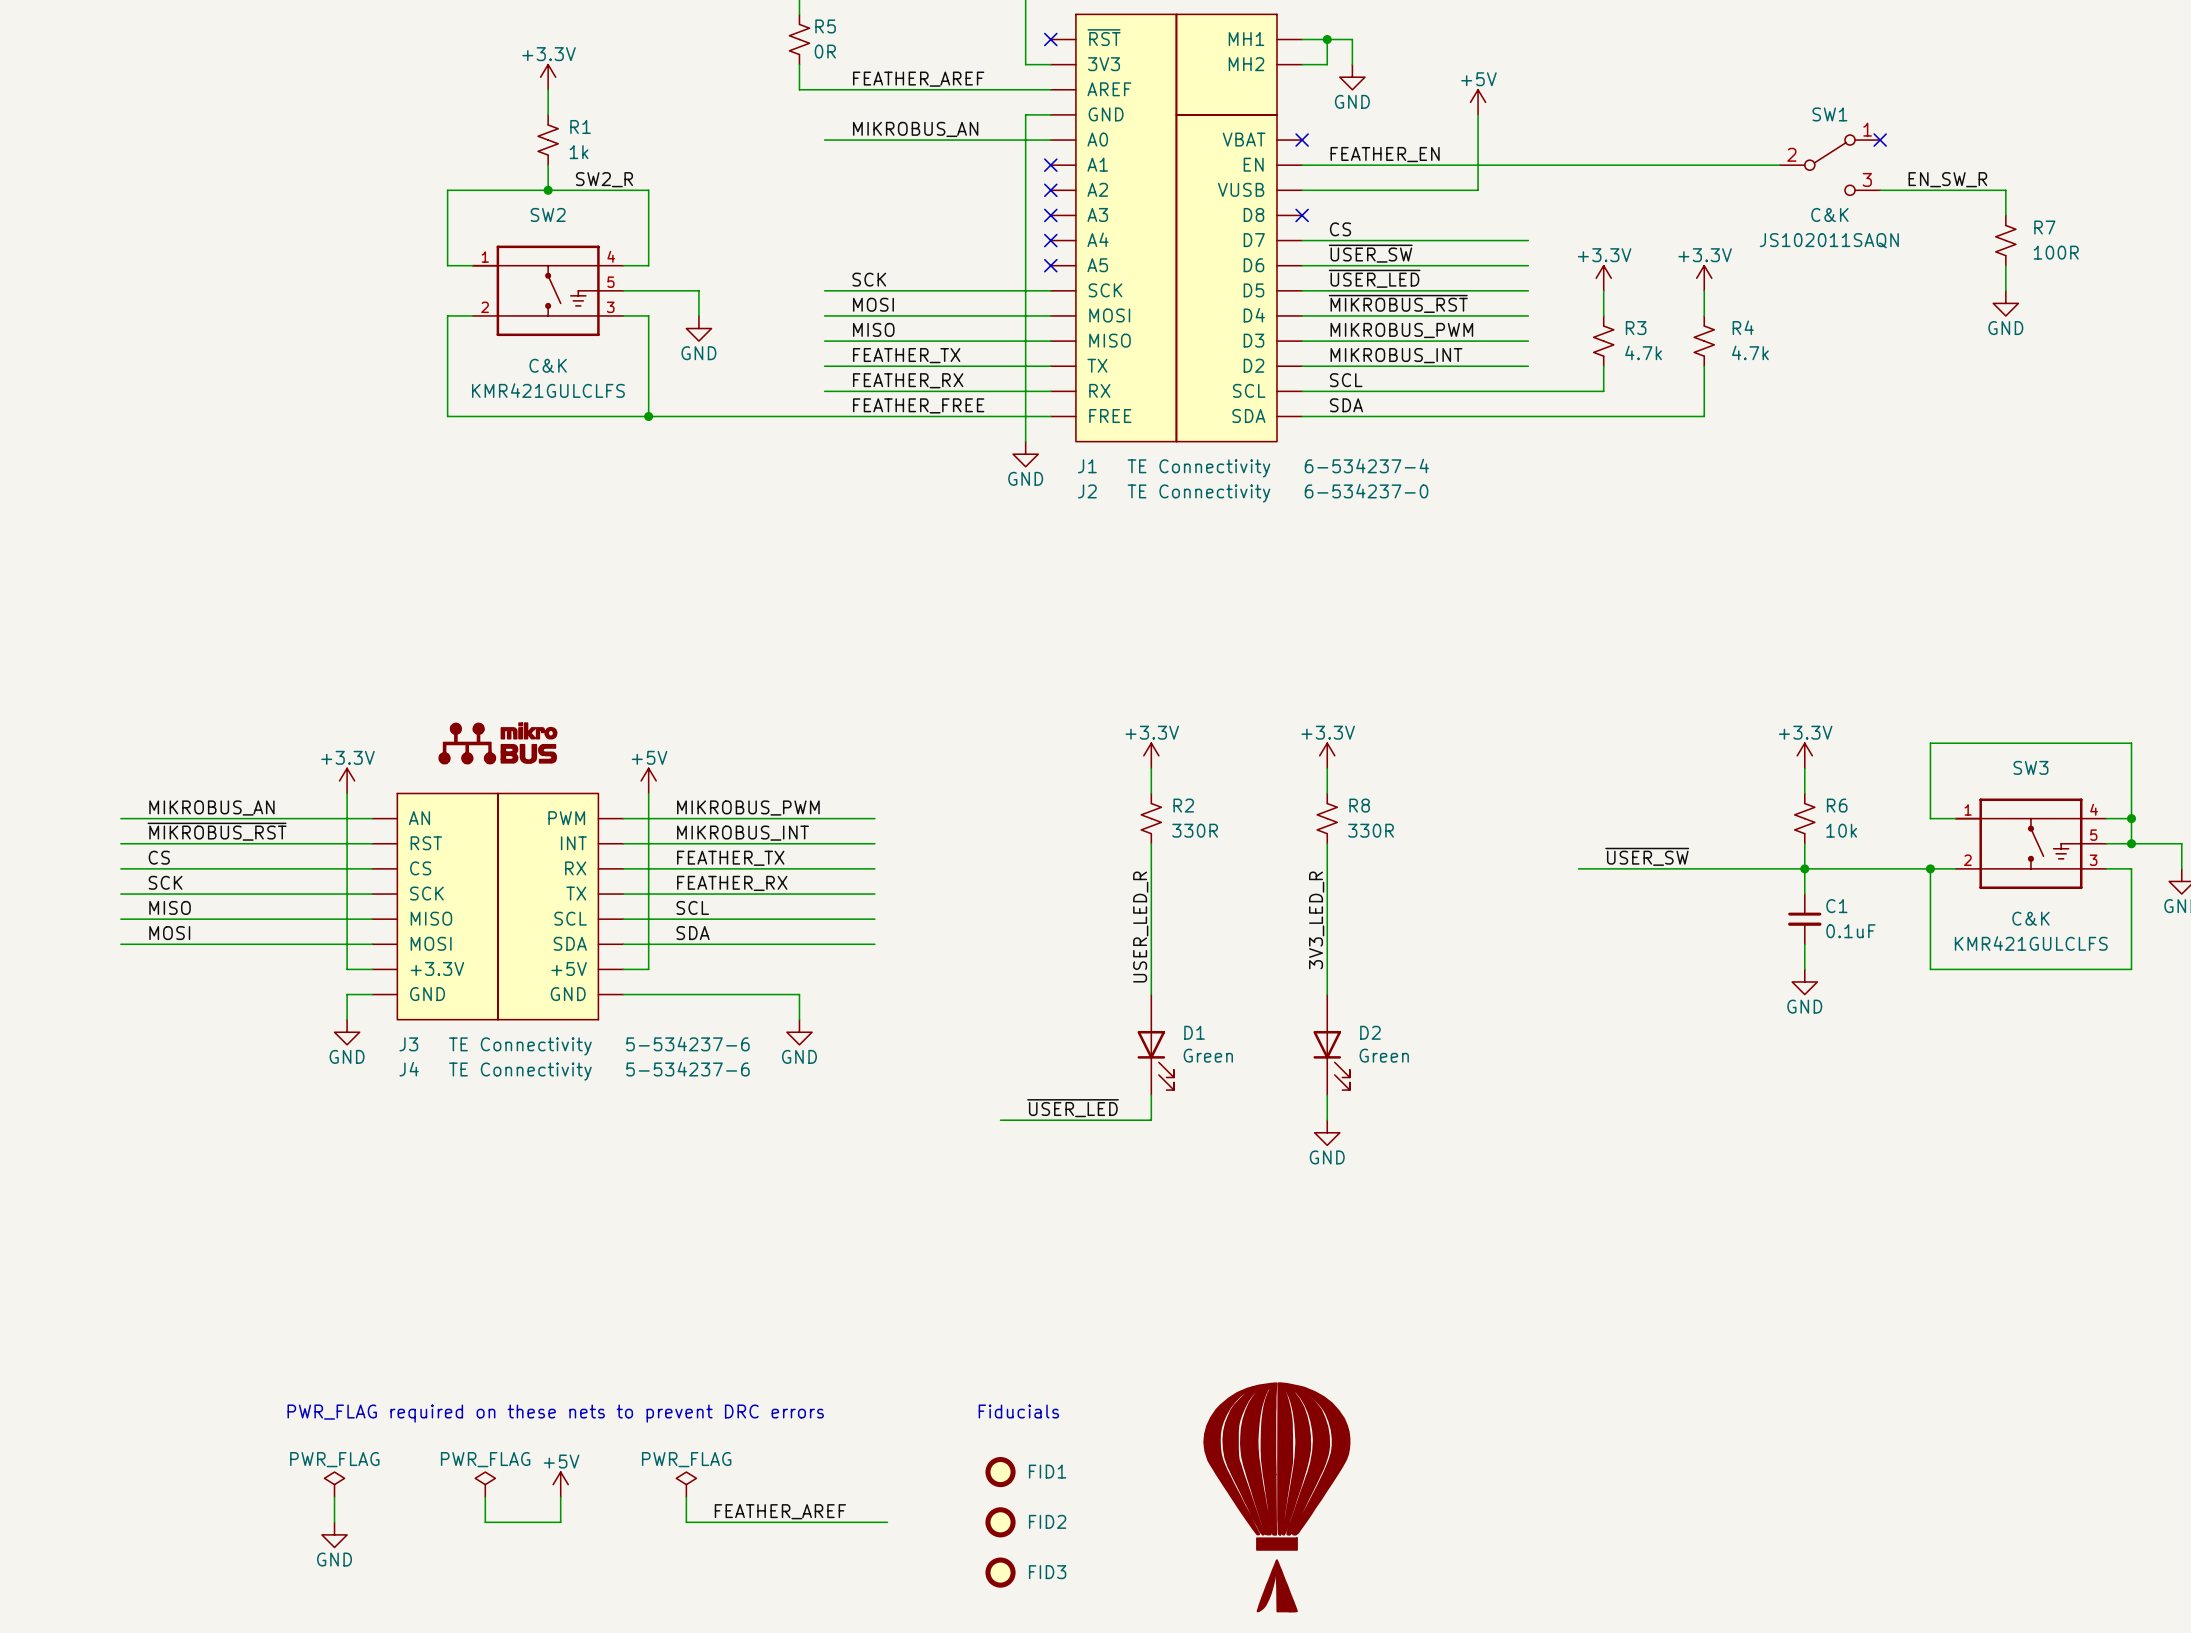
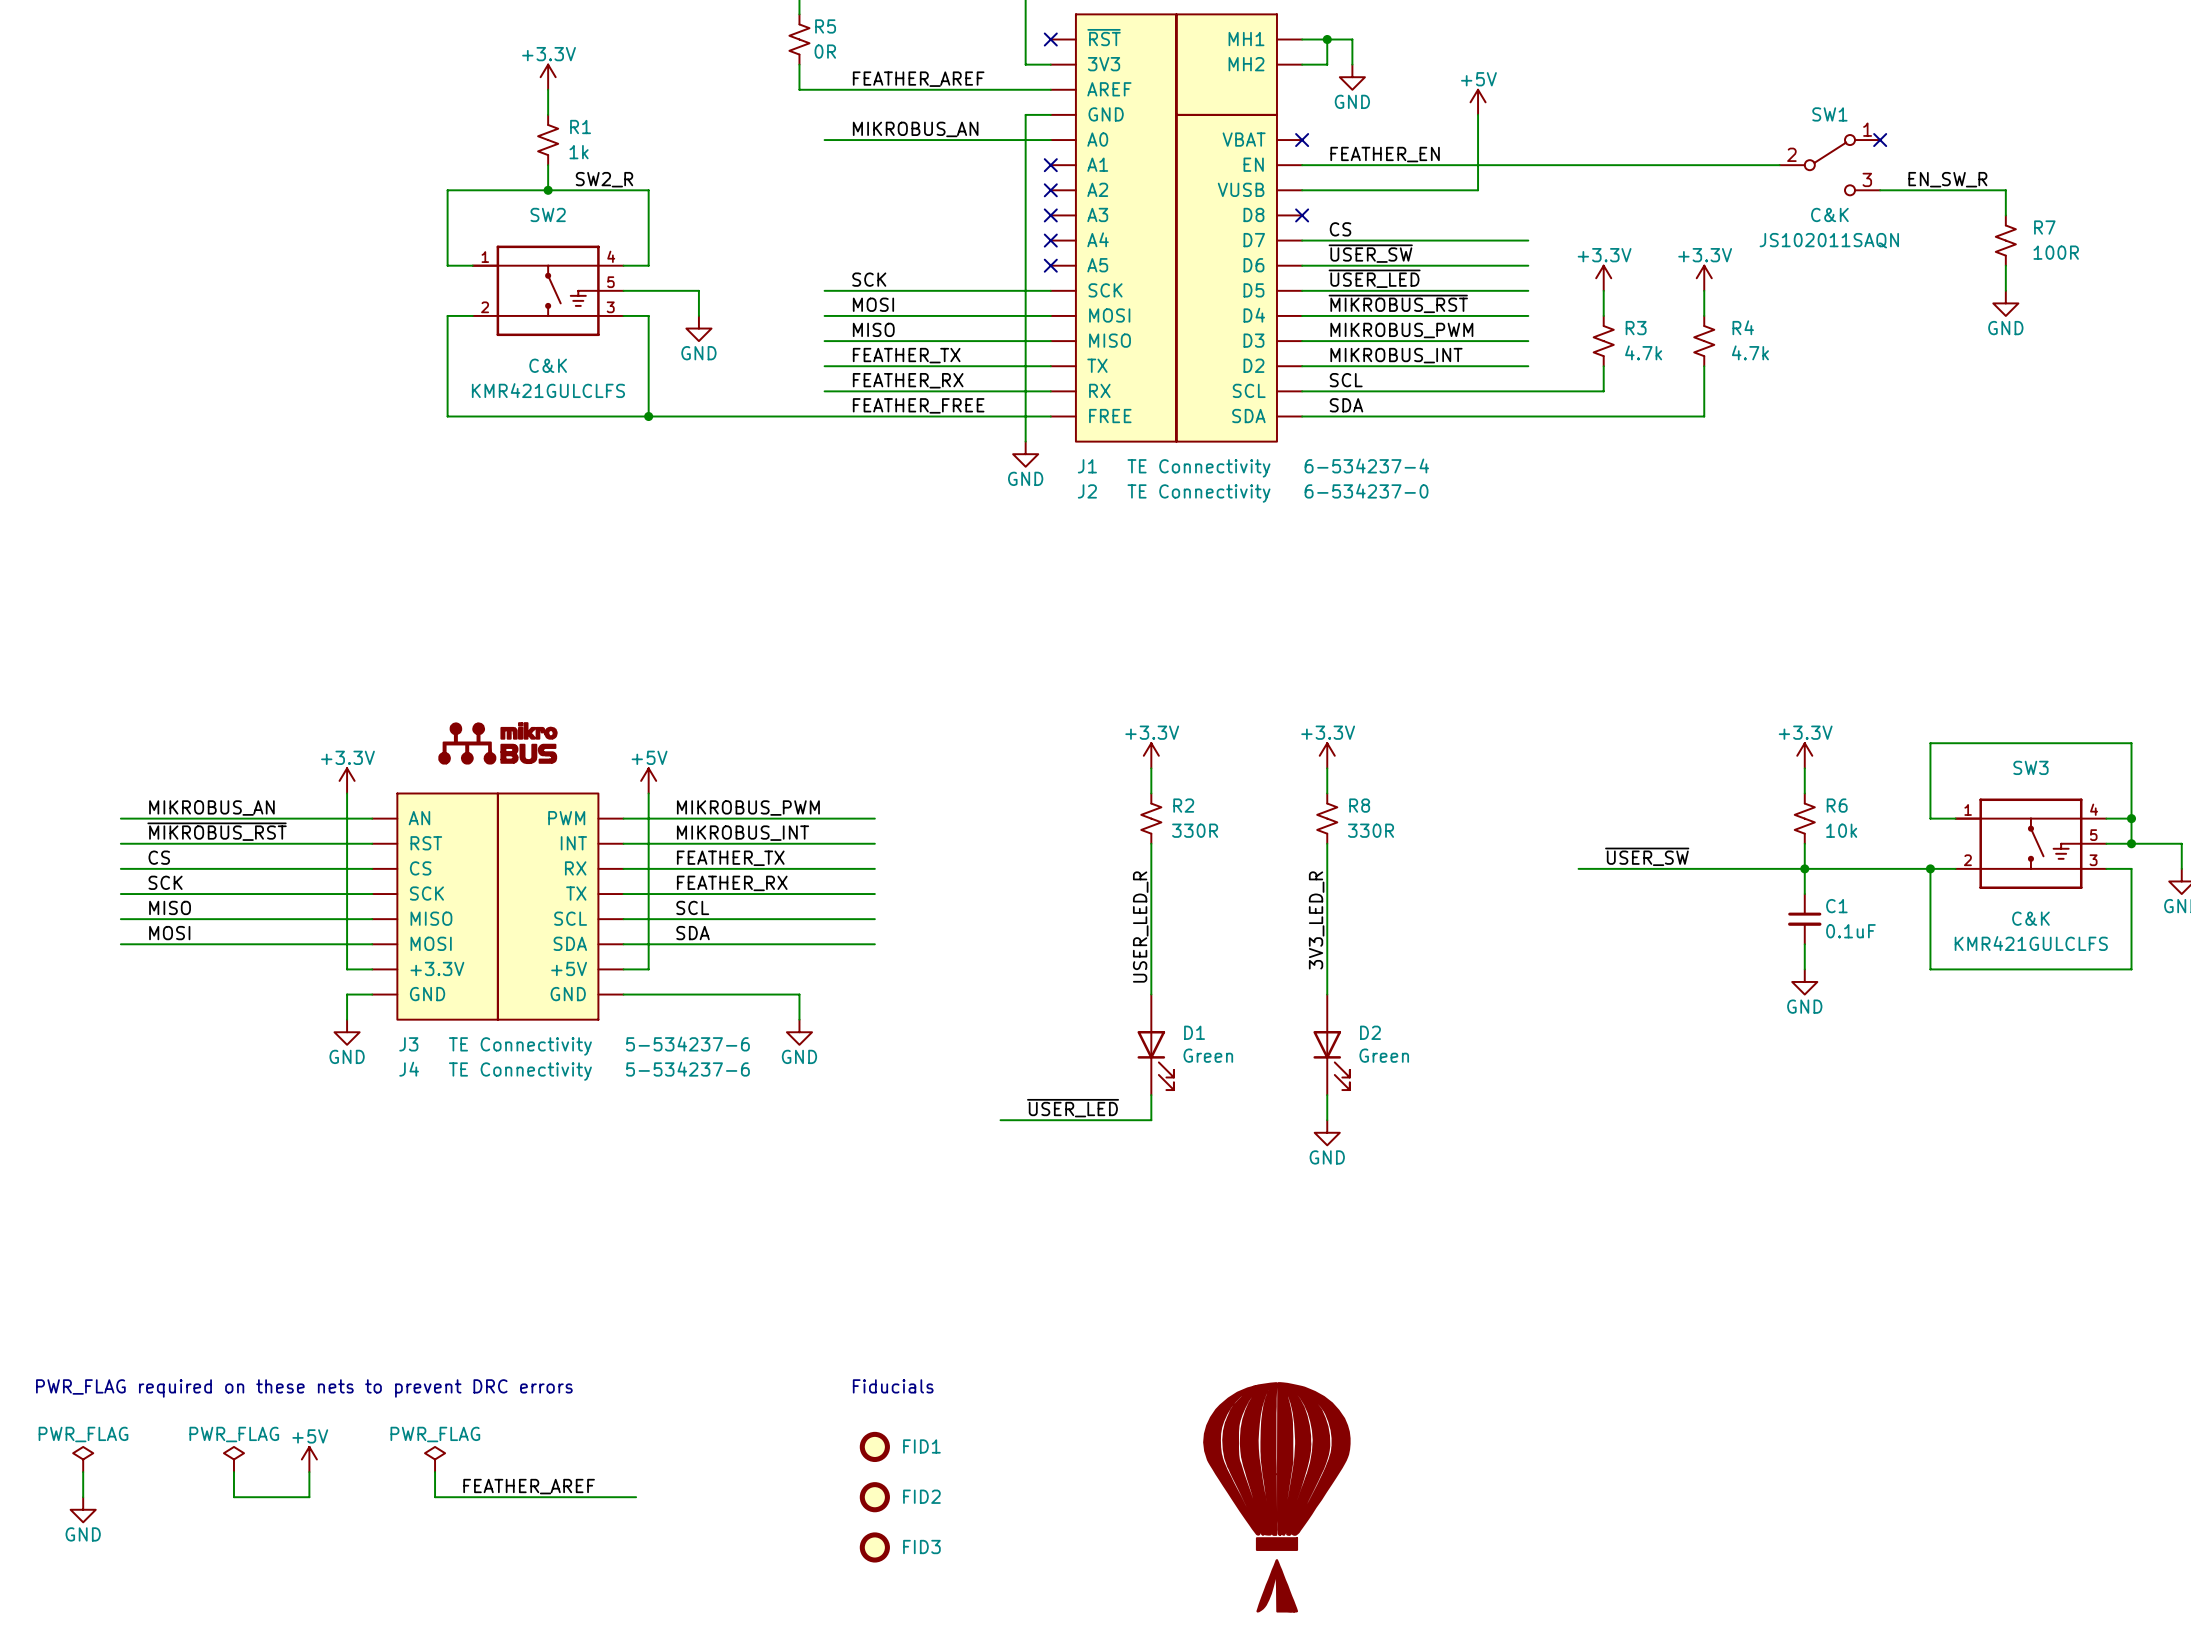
text: none -> PWR_FLAG required on these nets to prevent DRC errors (304, 1388)
text position: Fiducials (1018, 1411) -> Fiducials (893, 1386)
text: PWR_FLAG required on these nets to prevent DRC errors (555, 1413) -> none
power symbol: none -> PWR_FLAG (83, 1459)
power symbol: none -> PWR_FLAG (233, 1459)
power symbol: none -> +5V (309, 1459)
power symbol: none -> PWR_FLAG (435, 1459)
wire: none -> (83, 1472) (83, 1497)
wire: none -> (233, 1472) (233, 1497) (309, 1497) (309, 1472)
wire: none -> (435, 1472) (435, 1497) (636, 1497)
FID1 position: (1000, 1472) -> (874, 1446)
power symbol: PWR_FLAG (334, 1484) -> none
power symbol: PWR_FLAG (485, 1484) -> none
power symbol: +5V (560, 1484) -> none
power symbol: PWR_FLAG (686, 1484) -> none
label: none -> FEATHER_AREF (529, 1486)
wire: (334, 1497) (334, 1522) -> none
wire: (485, 1497) (485, 1522) (560, 1522) (560, 1497) -> none
wire: (686, 1497) (686, 1522) (887, 1522) -> none
power symbol: none -> GND (83, 1509)
label: FEATHER_AREF (780, 1511) -> none
FID2 position: (1000, 1522) -> (874, 1497)
power symbol: GND (334, 1534) -> none
FID3 position: (1000, 1572) -> (874, 1547)

